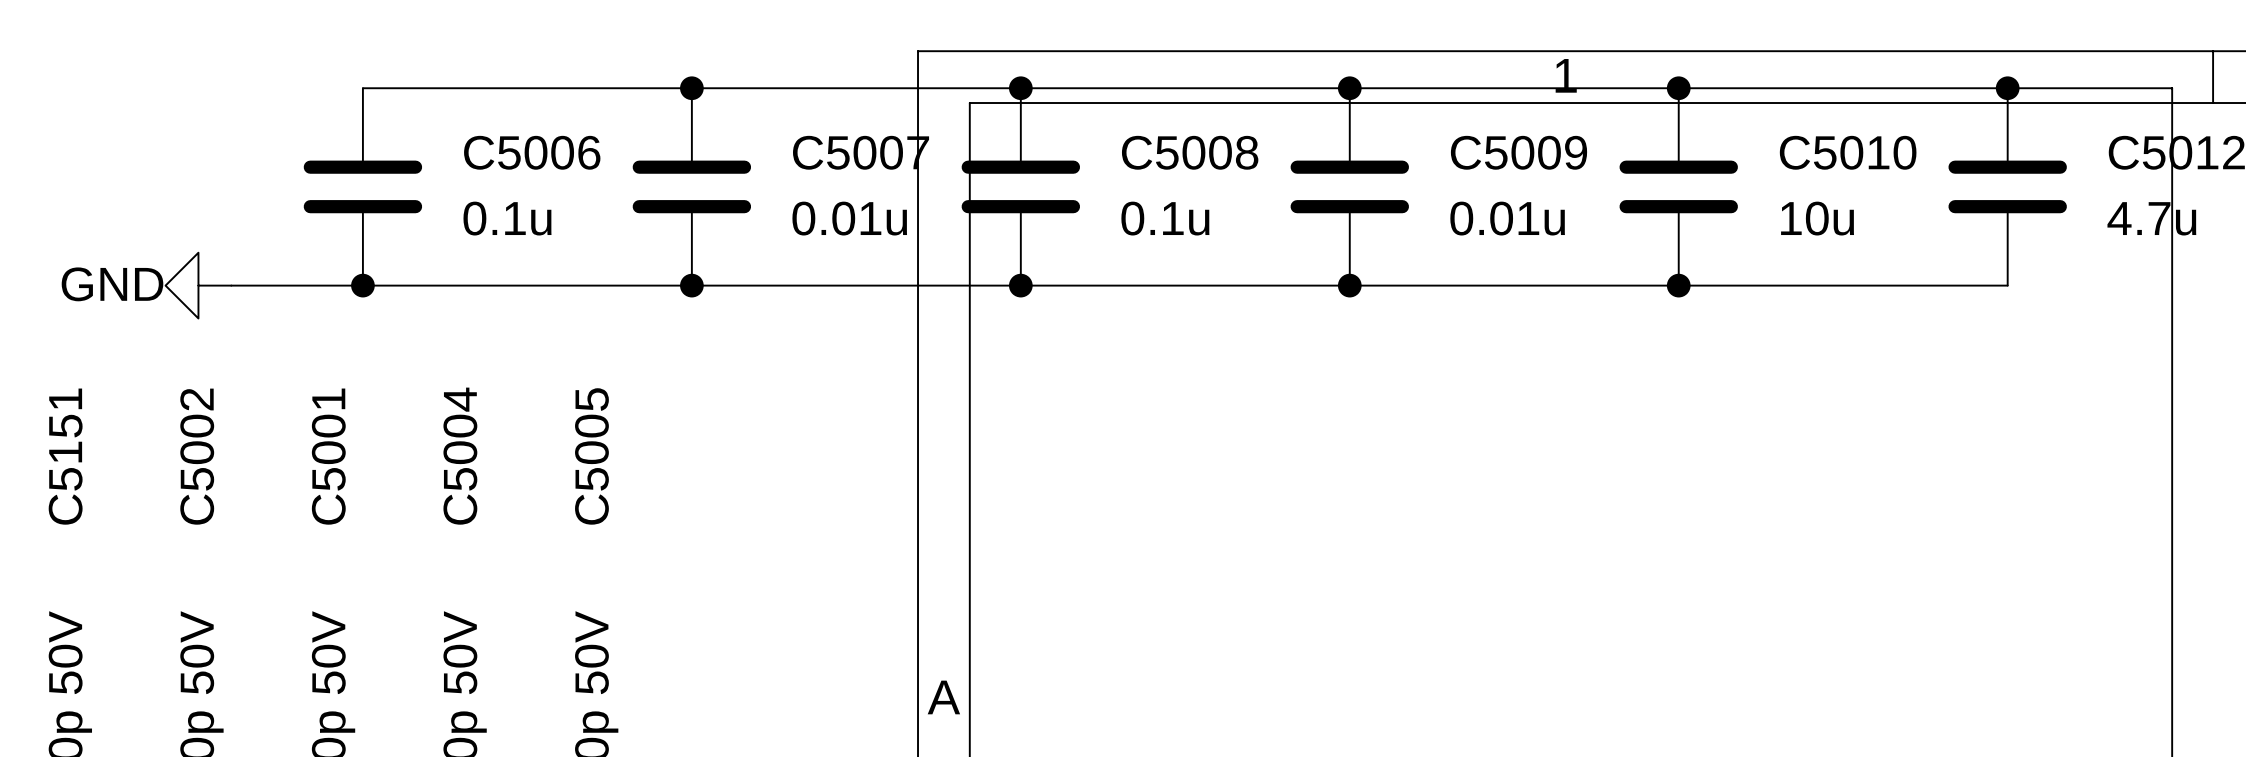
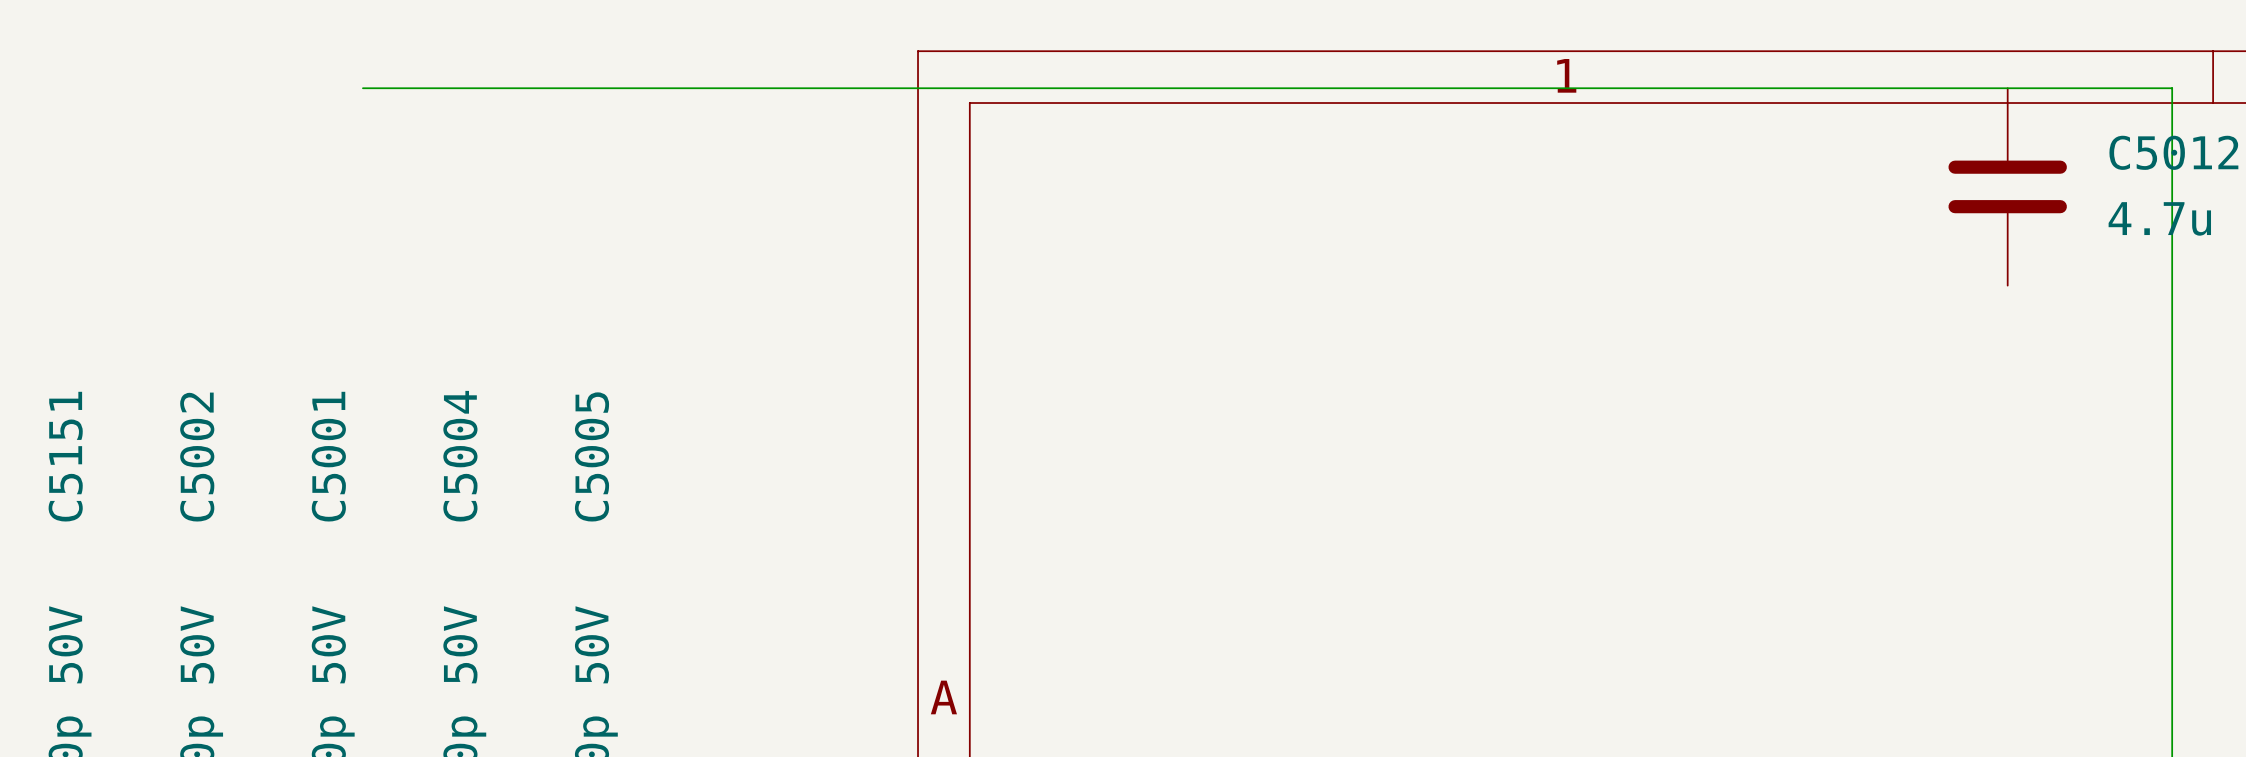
junction: (691, 88) -> none
junction: (1020, 88) -> none
junction: (1349, 88) -> none
junction: (1678, 88) -> none
junction: (2007, 88) -> none
C5006: 0.1u (362, 186) -> none
C5007: 0.01u (691, 186) -> none
C5008: 0.1u (1020, 186) -> none
C5009: 0.01u (1349, 186) -> none
C5010: 10u (1678, 186) -> none
power symbol: GND (198, 285) -> none
wire: (231, 285) (2007, 285) -> none
junction: (362, 285) -> none
junction: (691, 285) -> none
junction: (1020, 285) -> none
junction: (1349, 285) -> none
junction: (1678, 285) -> none

